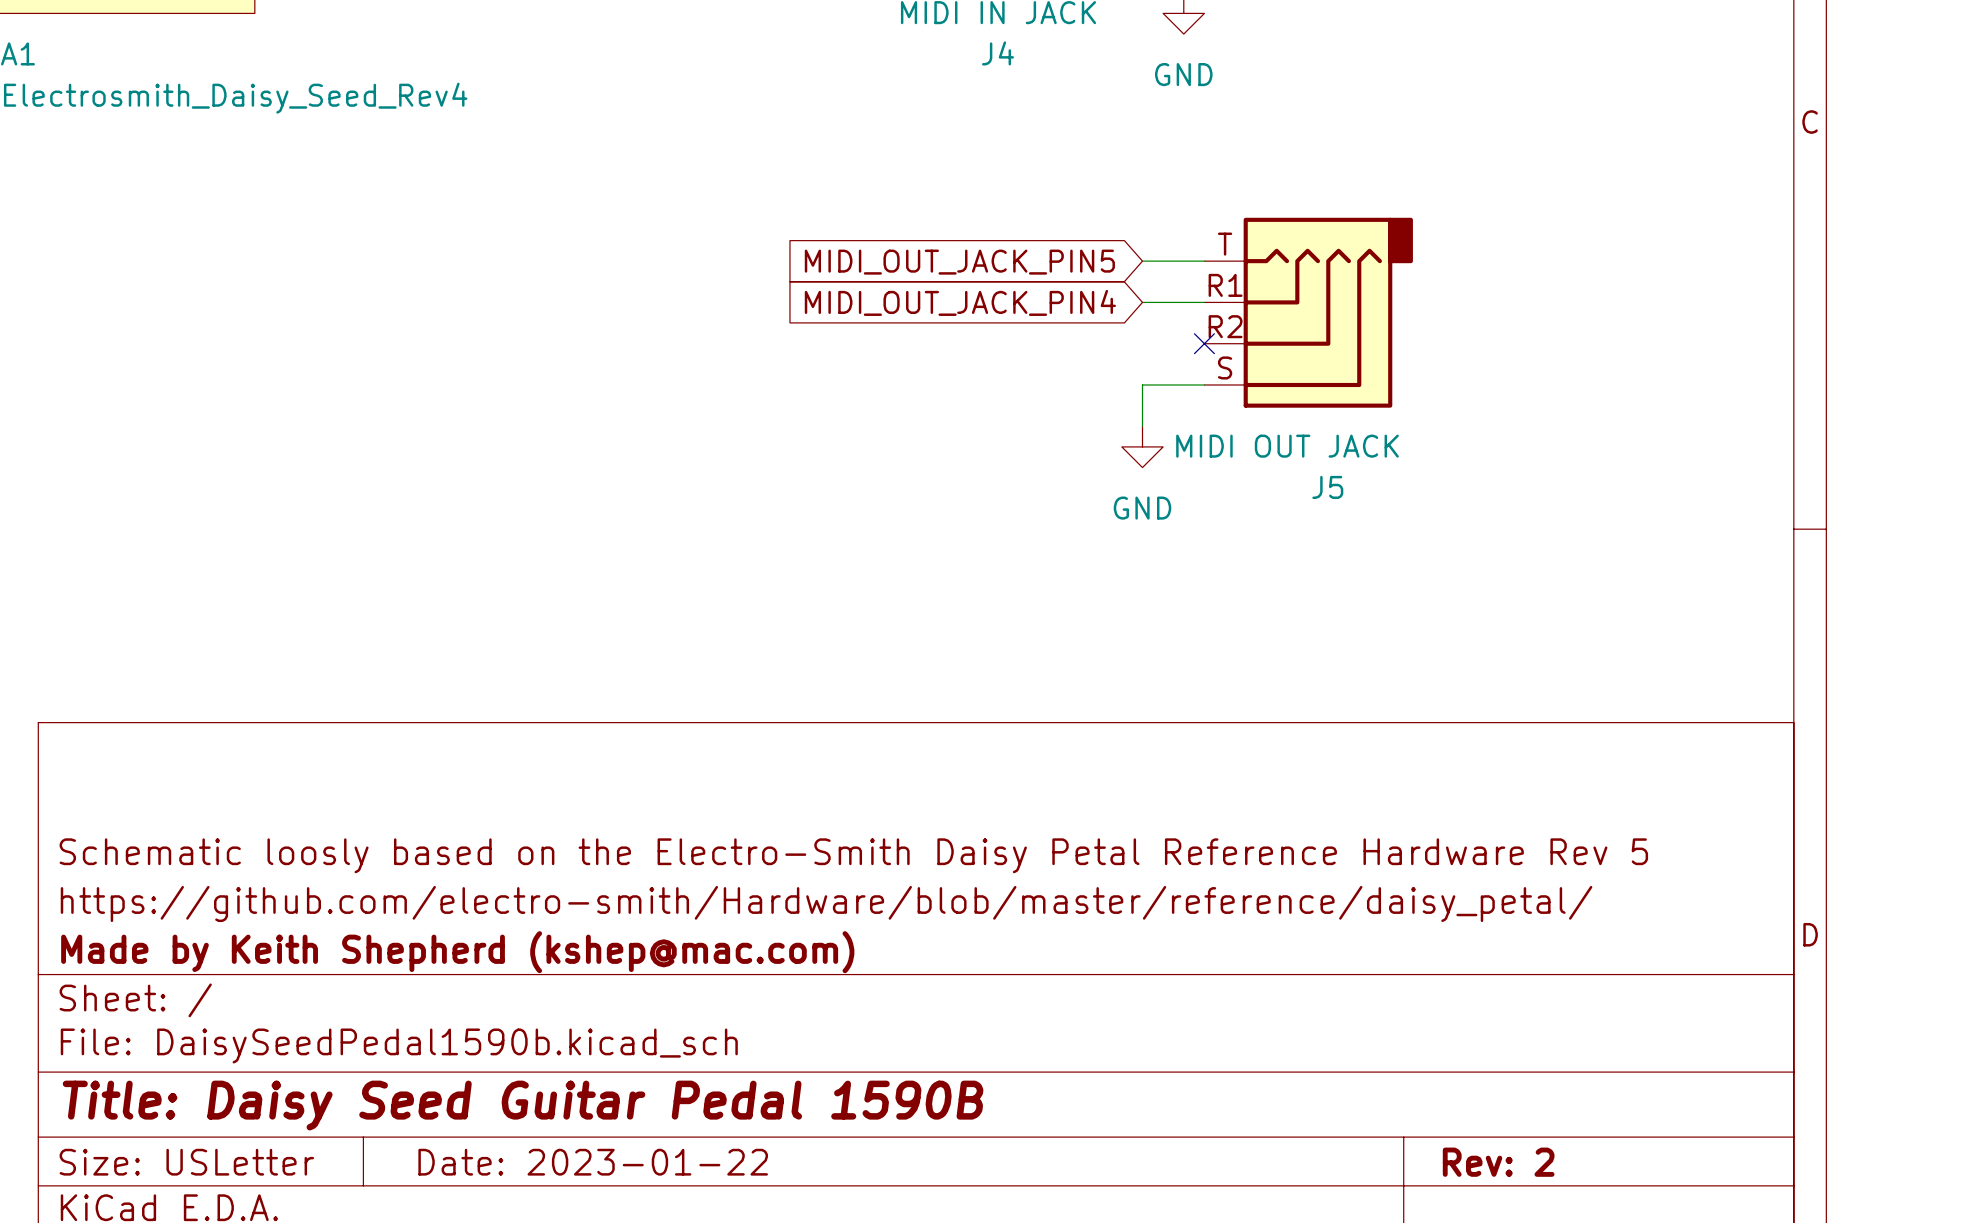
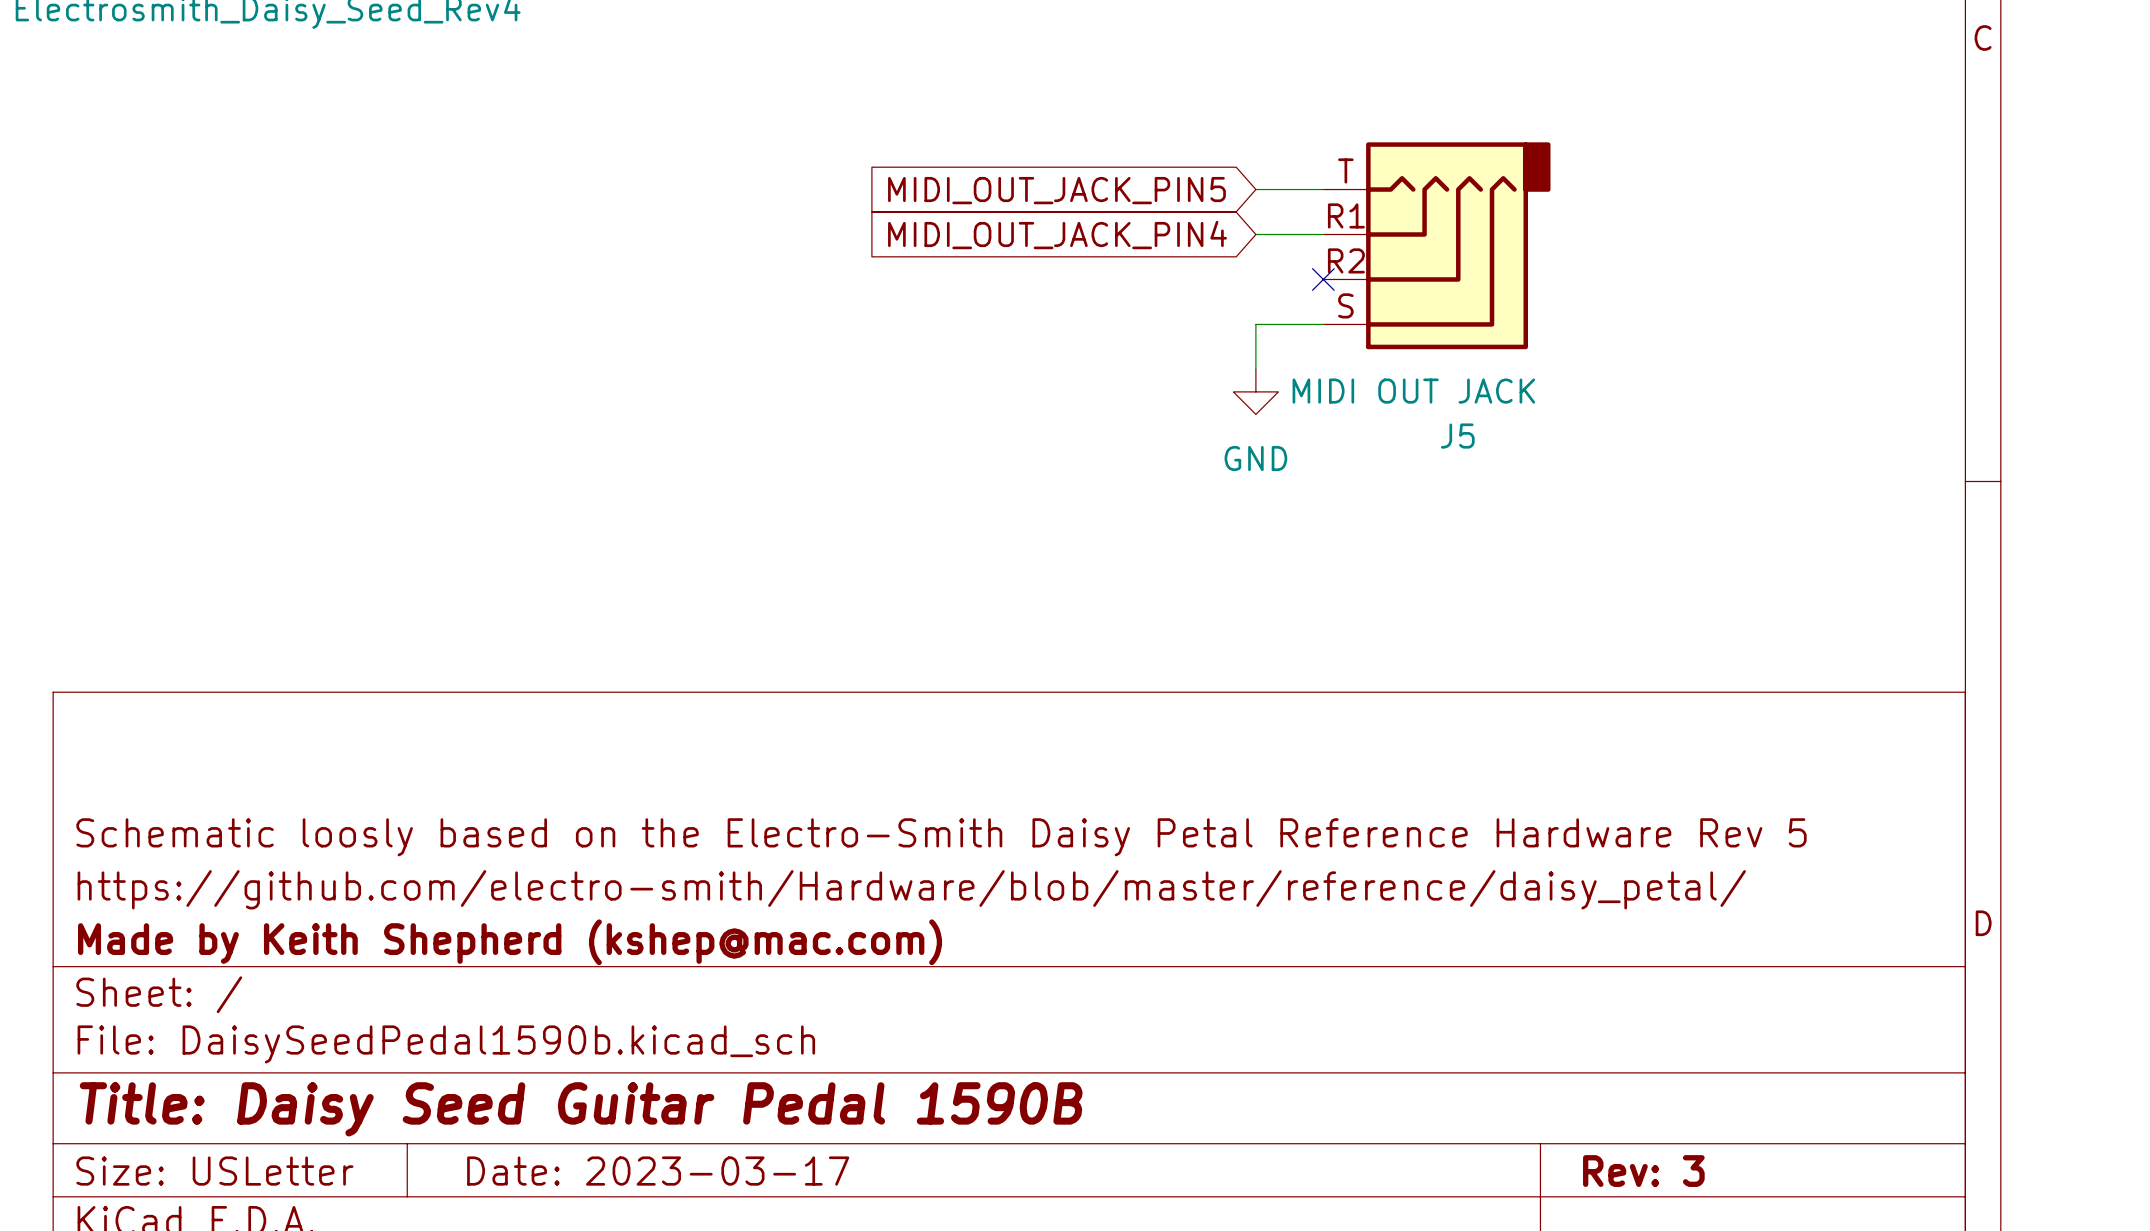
title block: Date: 2023-01-22 (593, 1162) -> Date: 2023-03-17 (658, 1171)
title block: Rev: 2 (1498, 1162) -> Rev: 3 (1643, 1171)

